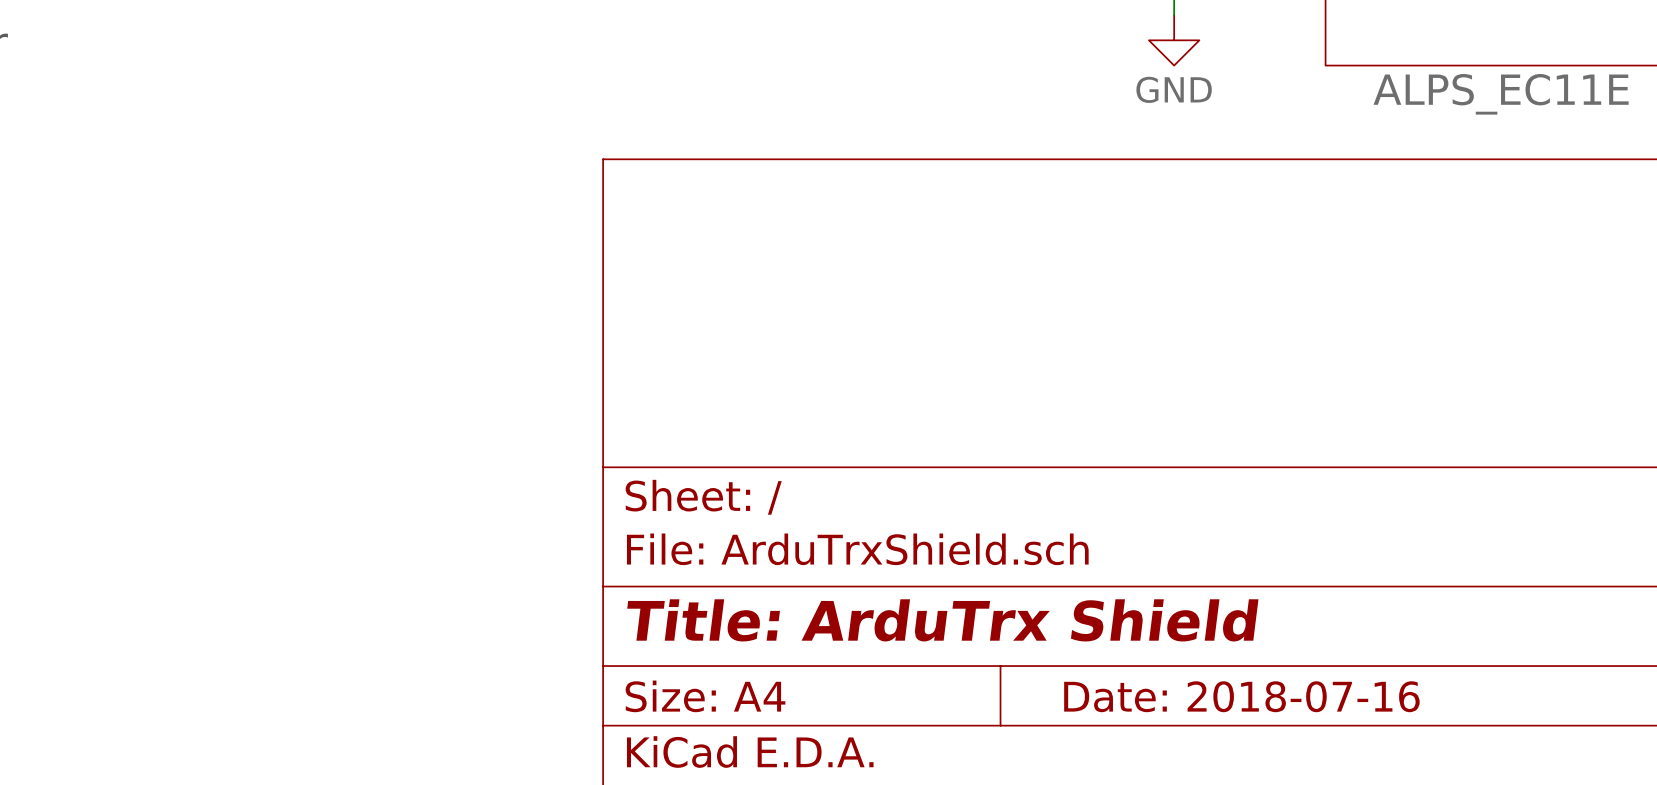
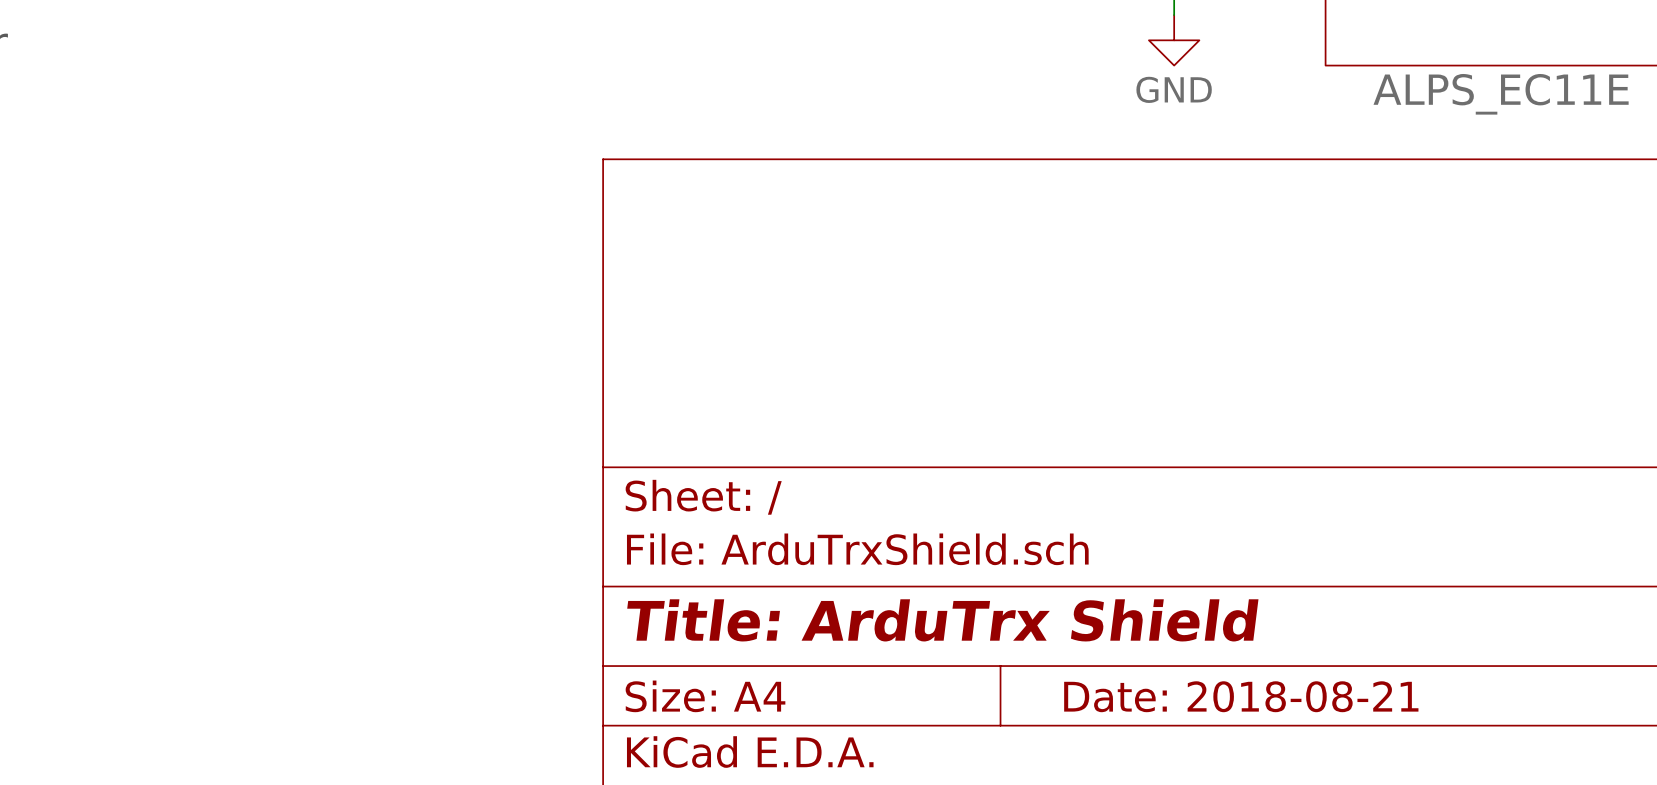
title block: Date: 2018-07-16 (1241, 696) -> Date: 2018-08-21 (1241, 696)

